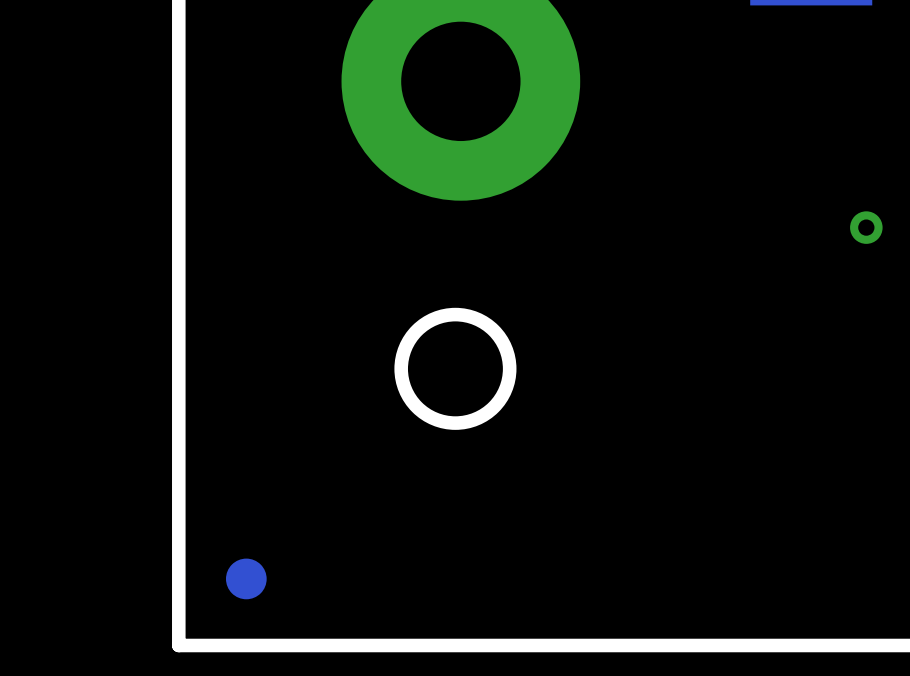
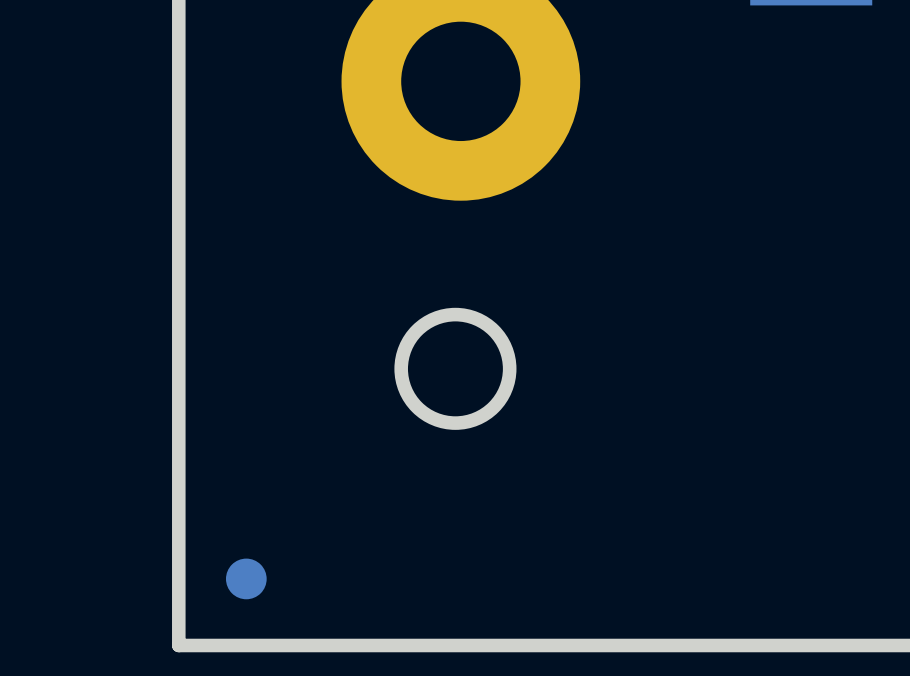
via: (866, 227) -> none

